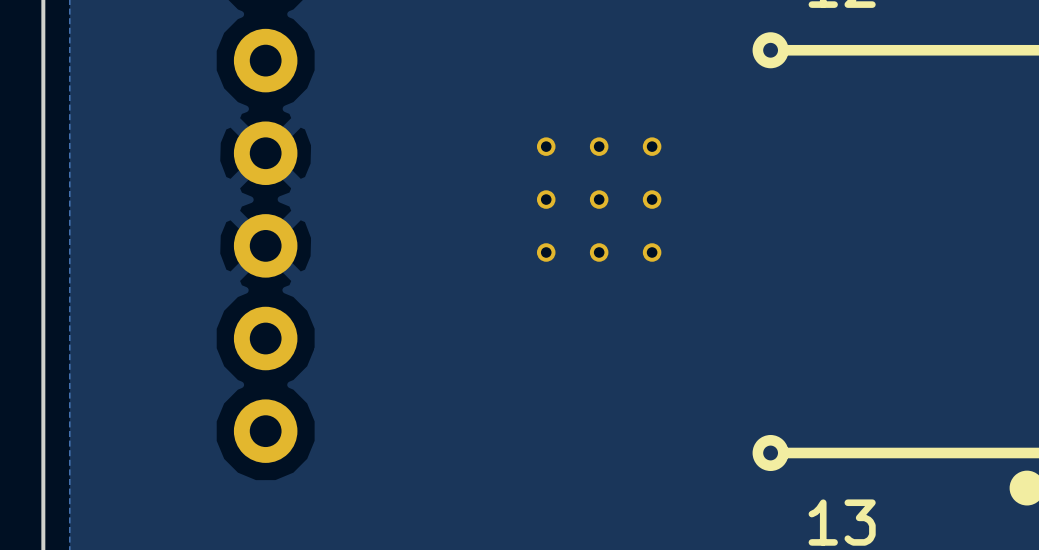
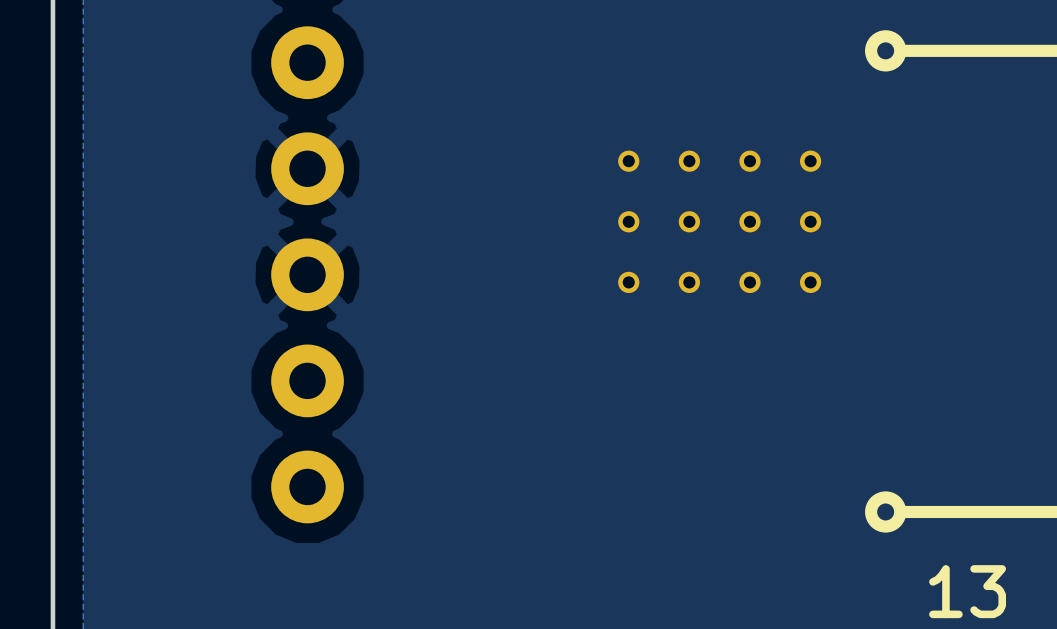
part: none -> (810, 161)
part: none -> (810, 221)
part: none -> (810, 282)

